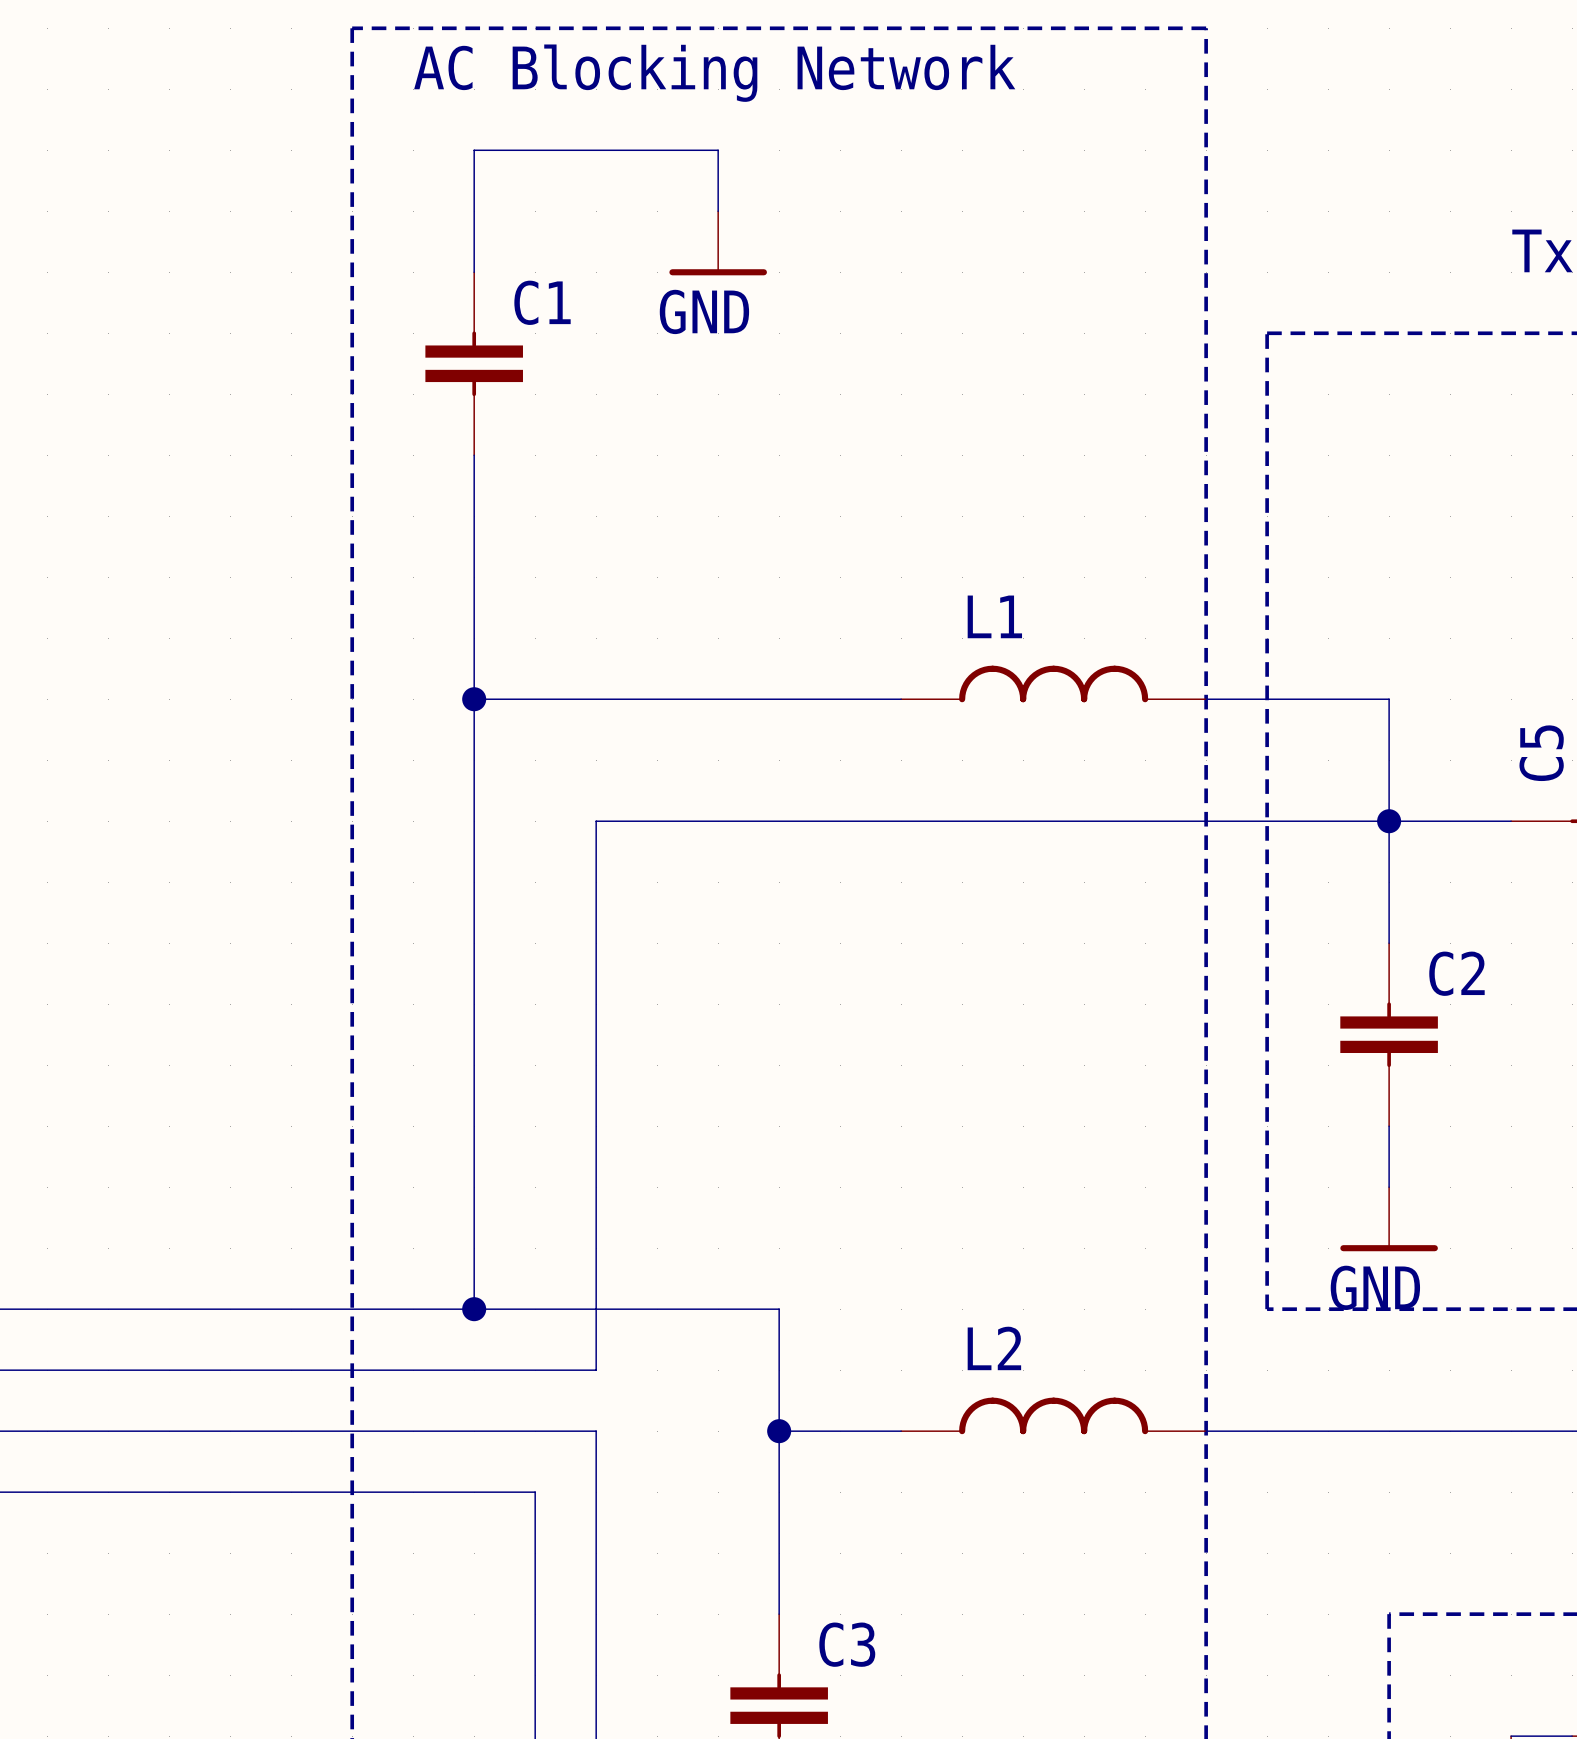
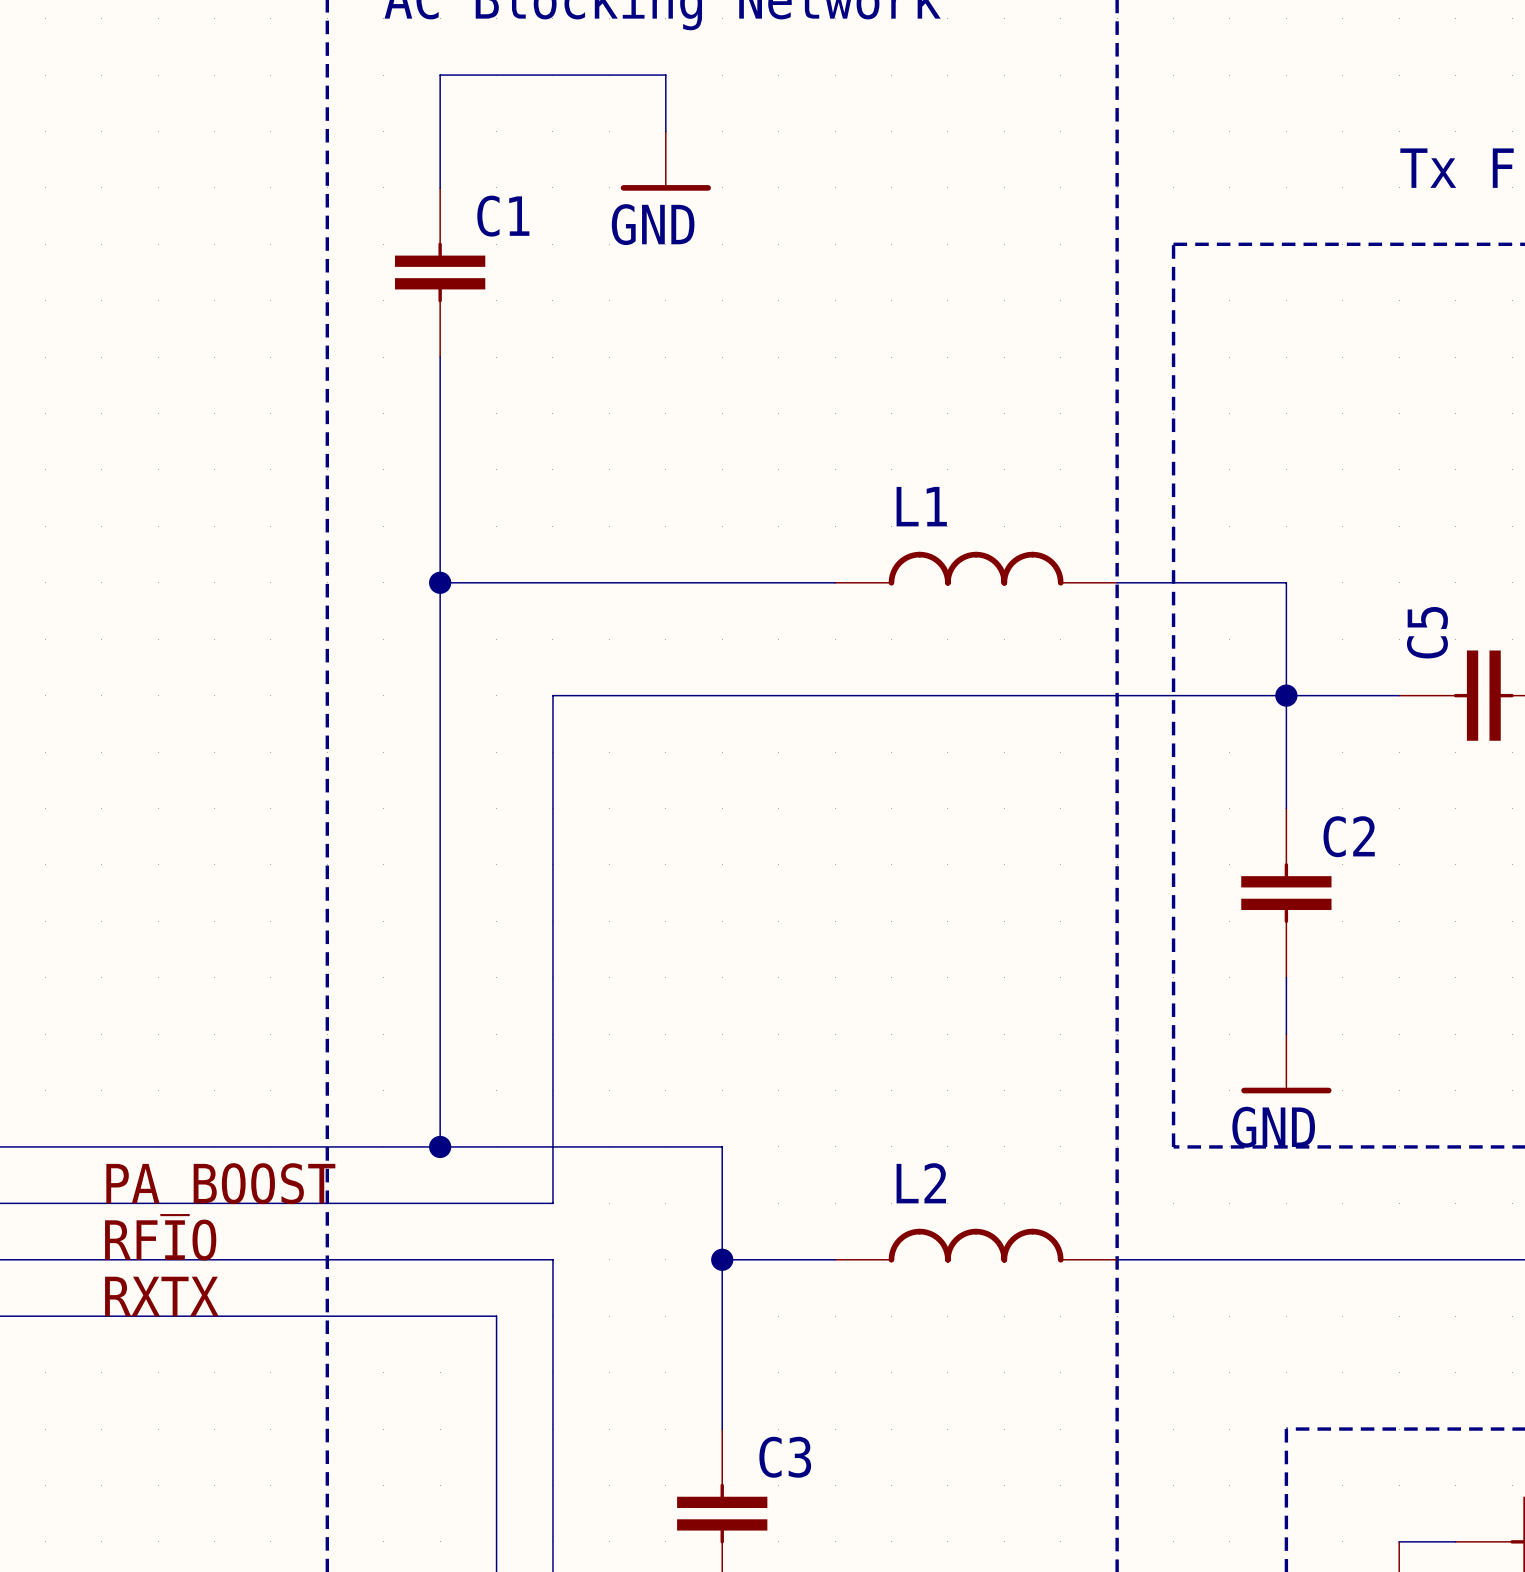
label: none -> PA_BOOST (220, 1189)
label: none -> RFIO (160, 1240)
label: none -> RXTX (161, 1296)

